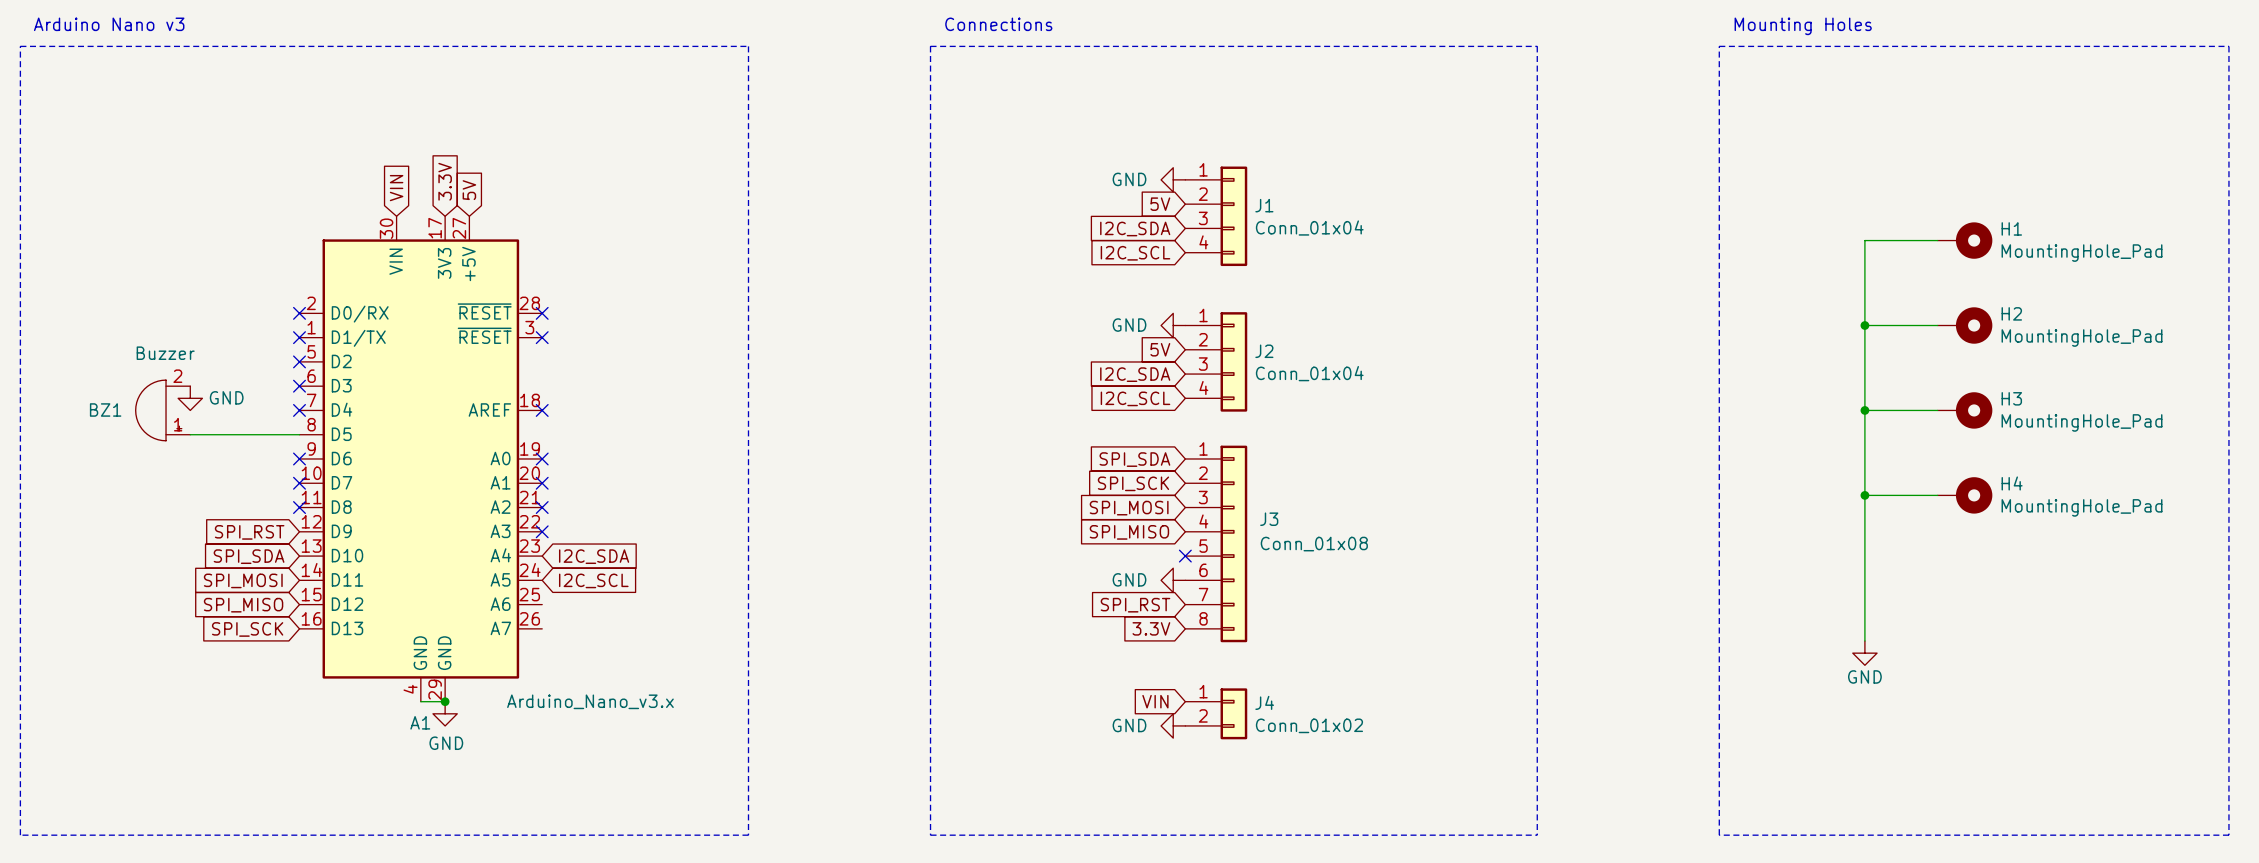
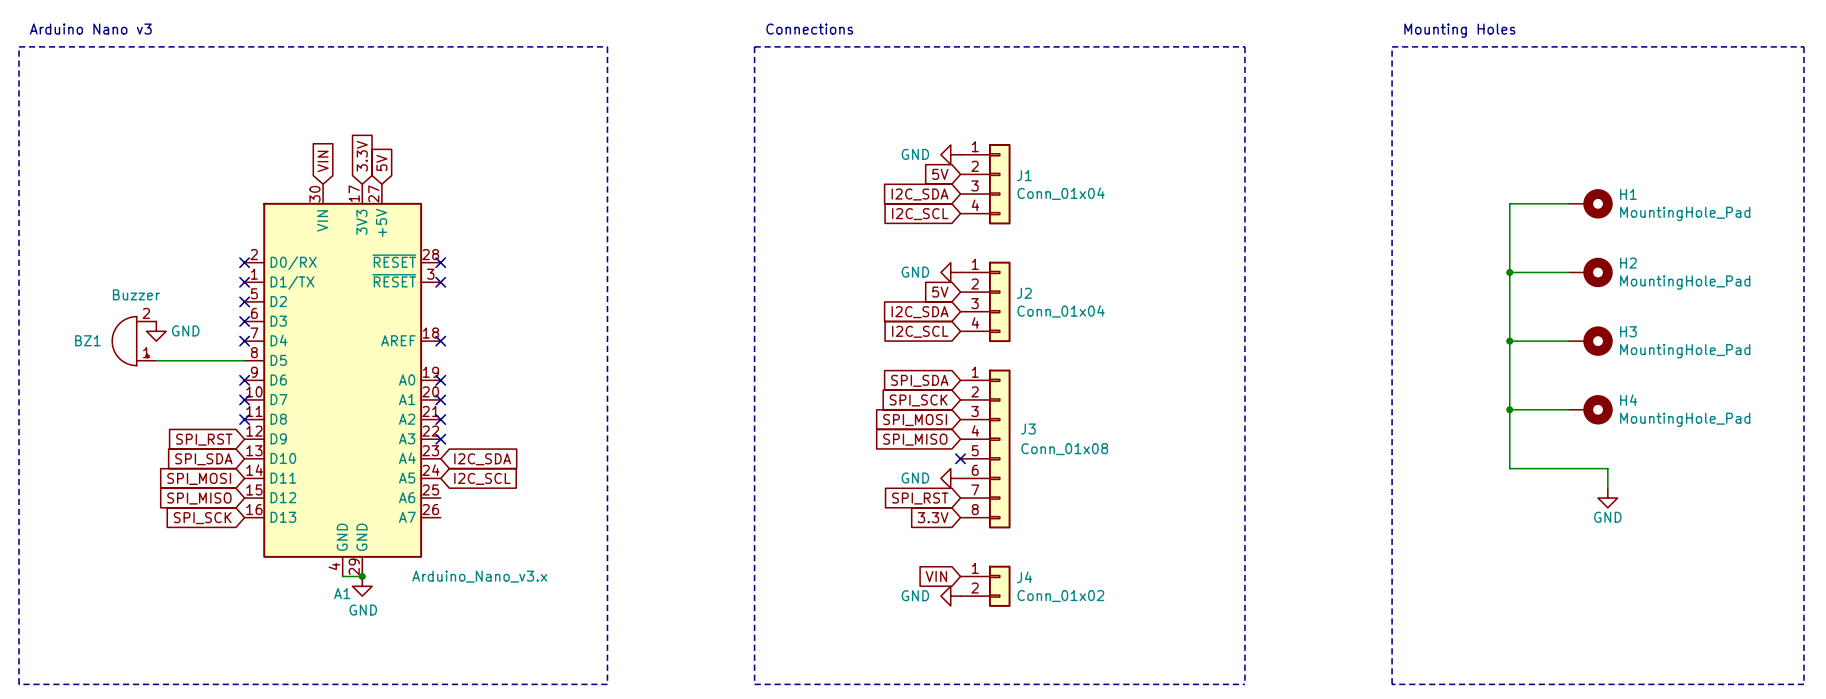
wire: (1864, 568) (1864, 641) -> (1509, 468) (1607, 468) (1607, 488)
power symbol position: GND (1864, 653) -> GND (1607, 498)

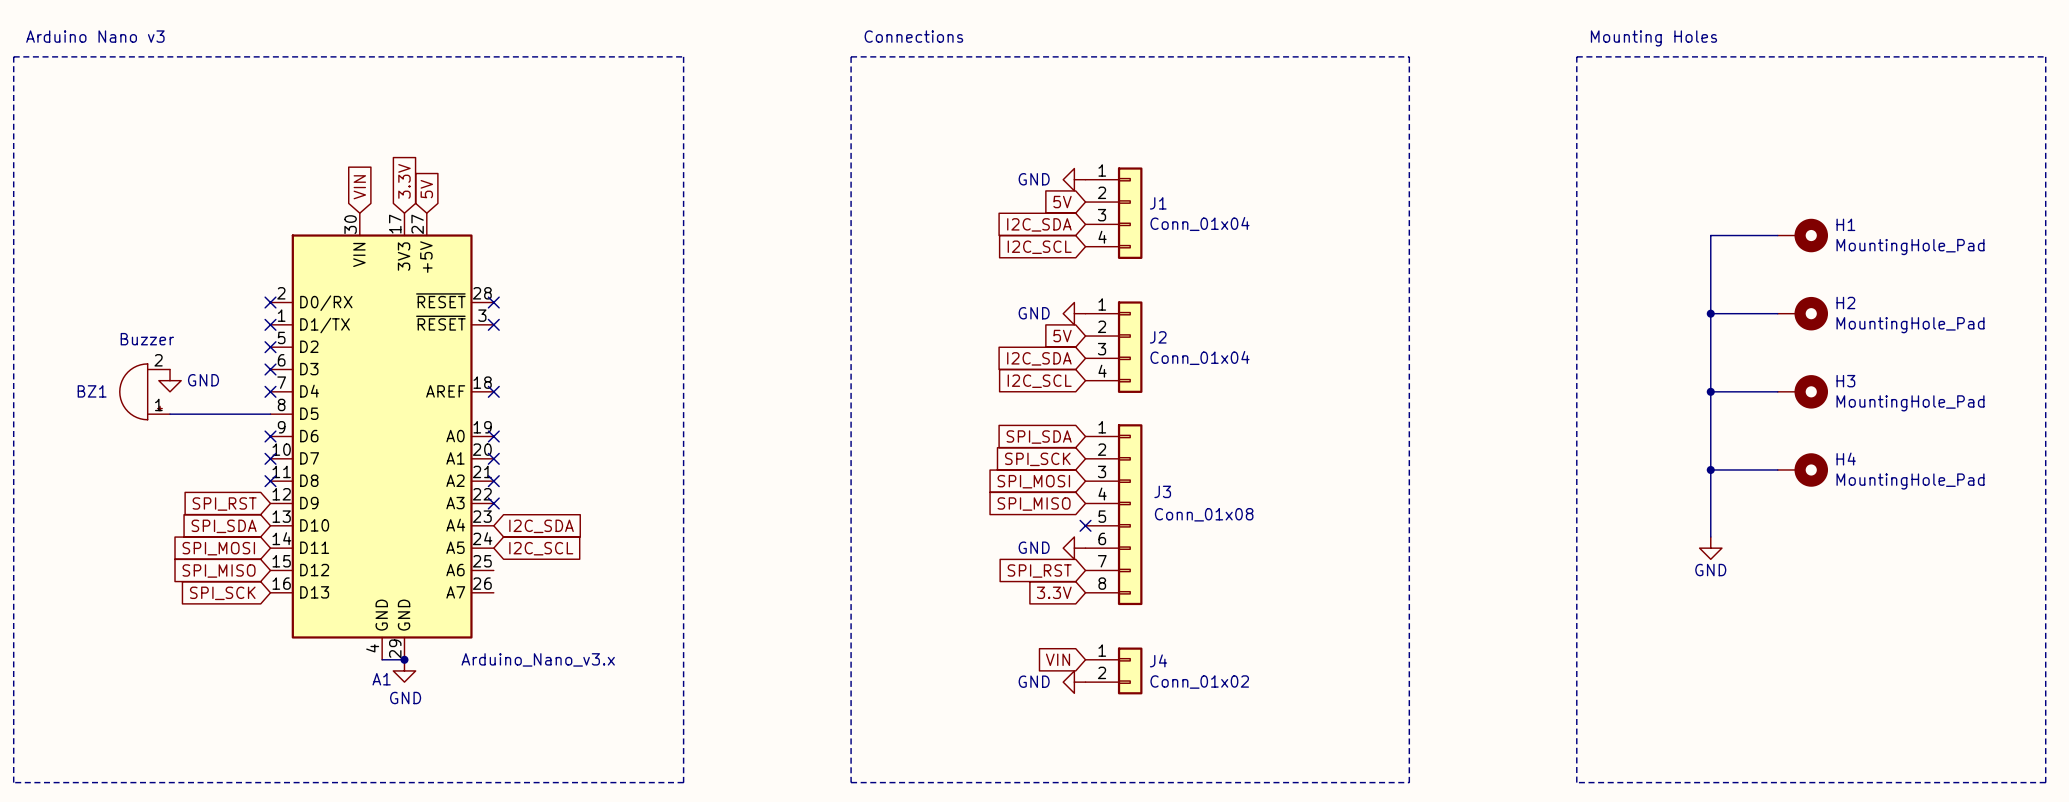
wire: (1509, 468) (1607, 468) (1607, 488) -> none
power symbol position: GND (1607, 498) -> GND (1710, 548)

